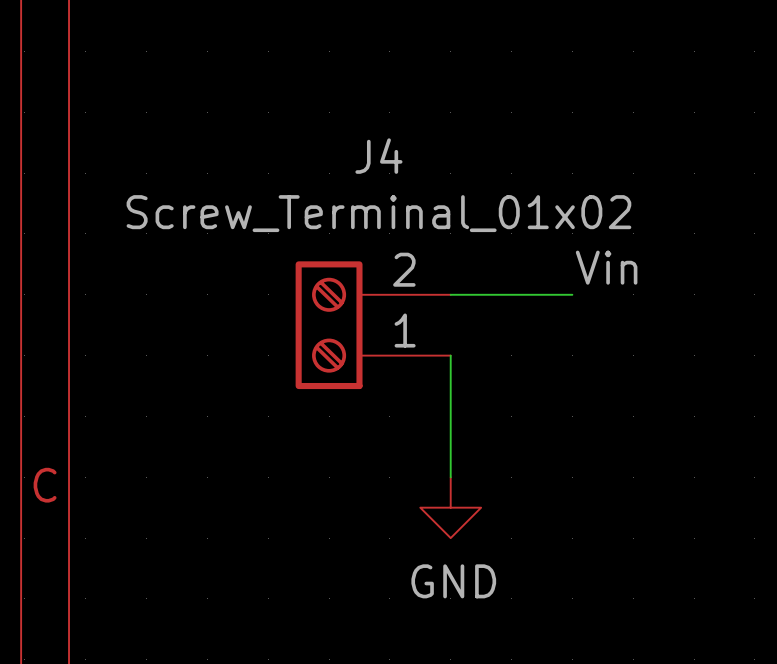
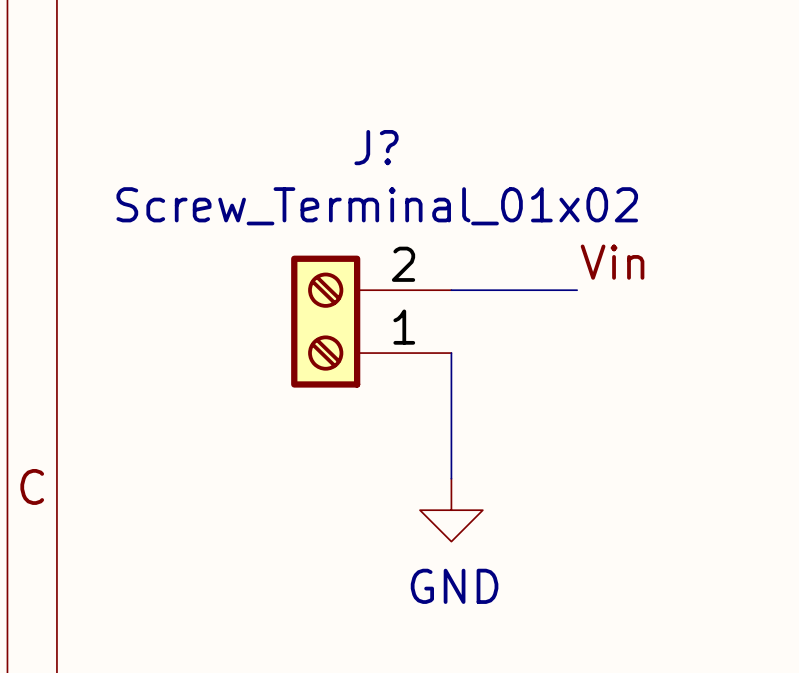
J4 name: J4 (378, 156) -> J? (376, 147)

